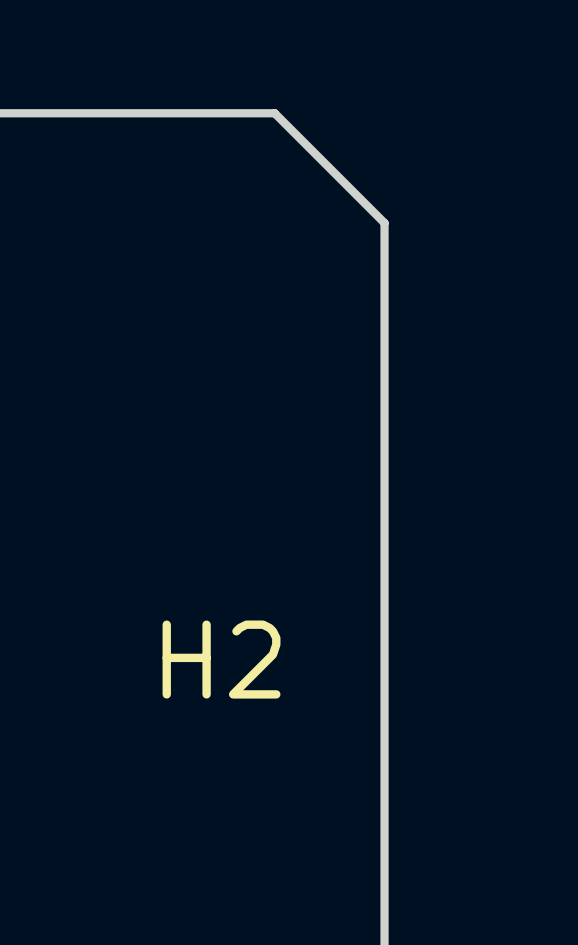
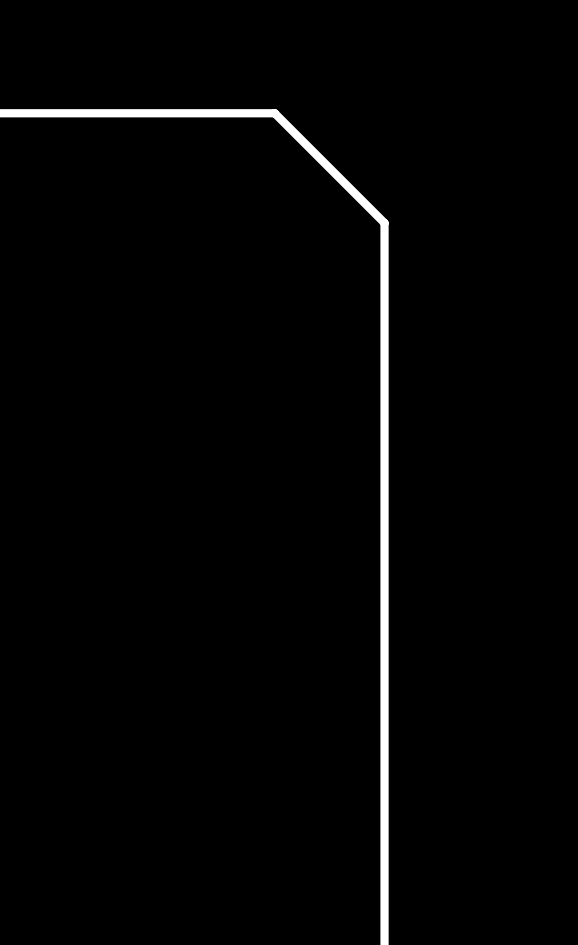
H2: (221, 659) -> none

